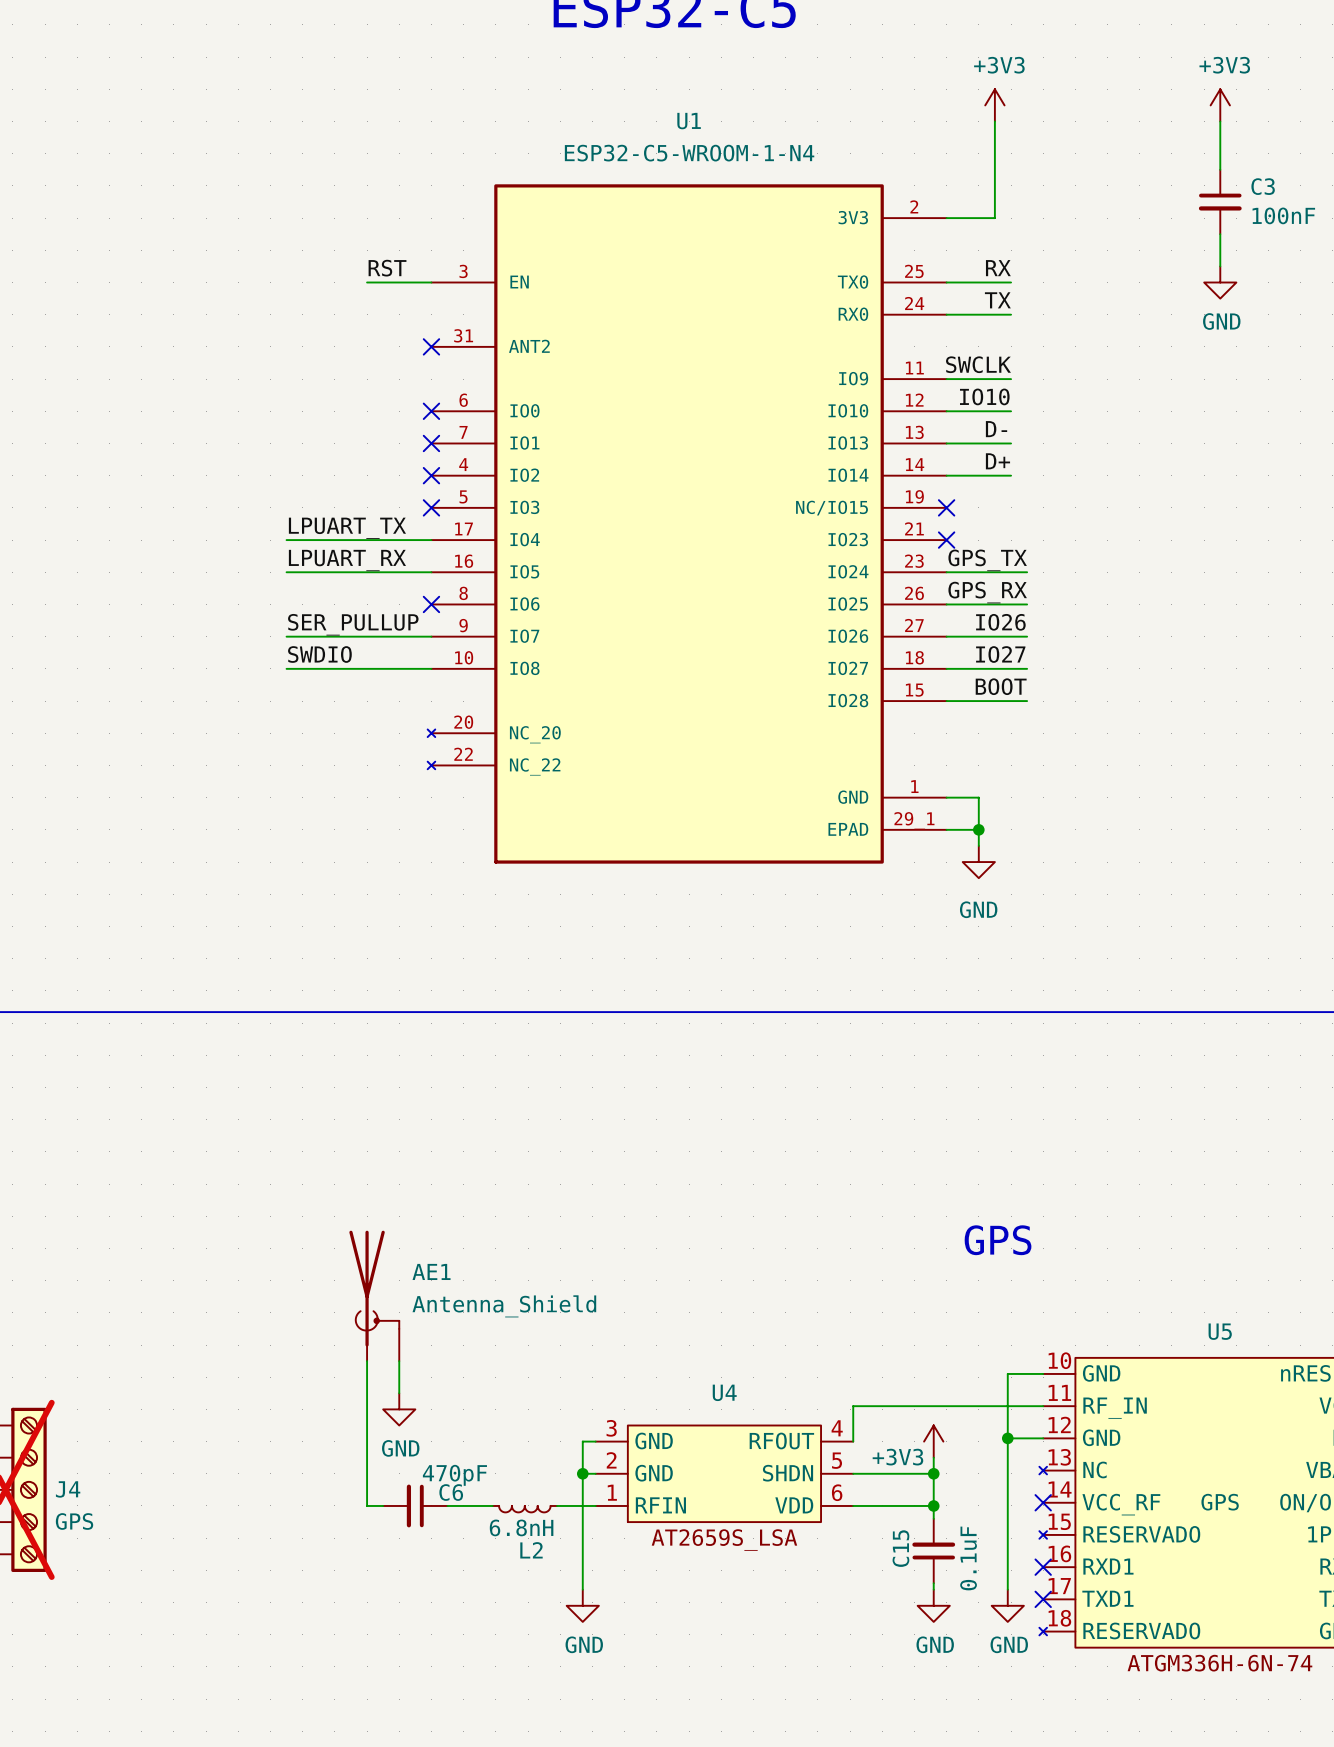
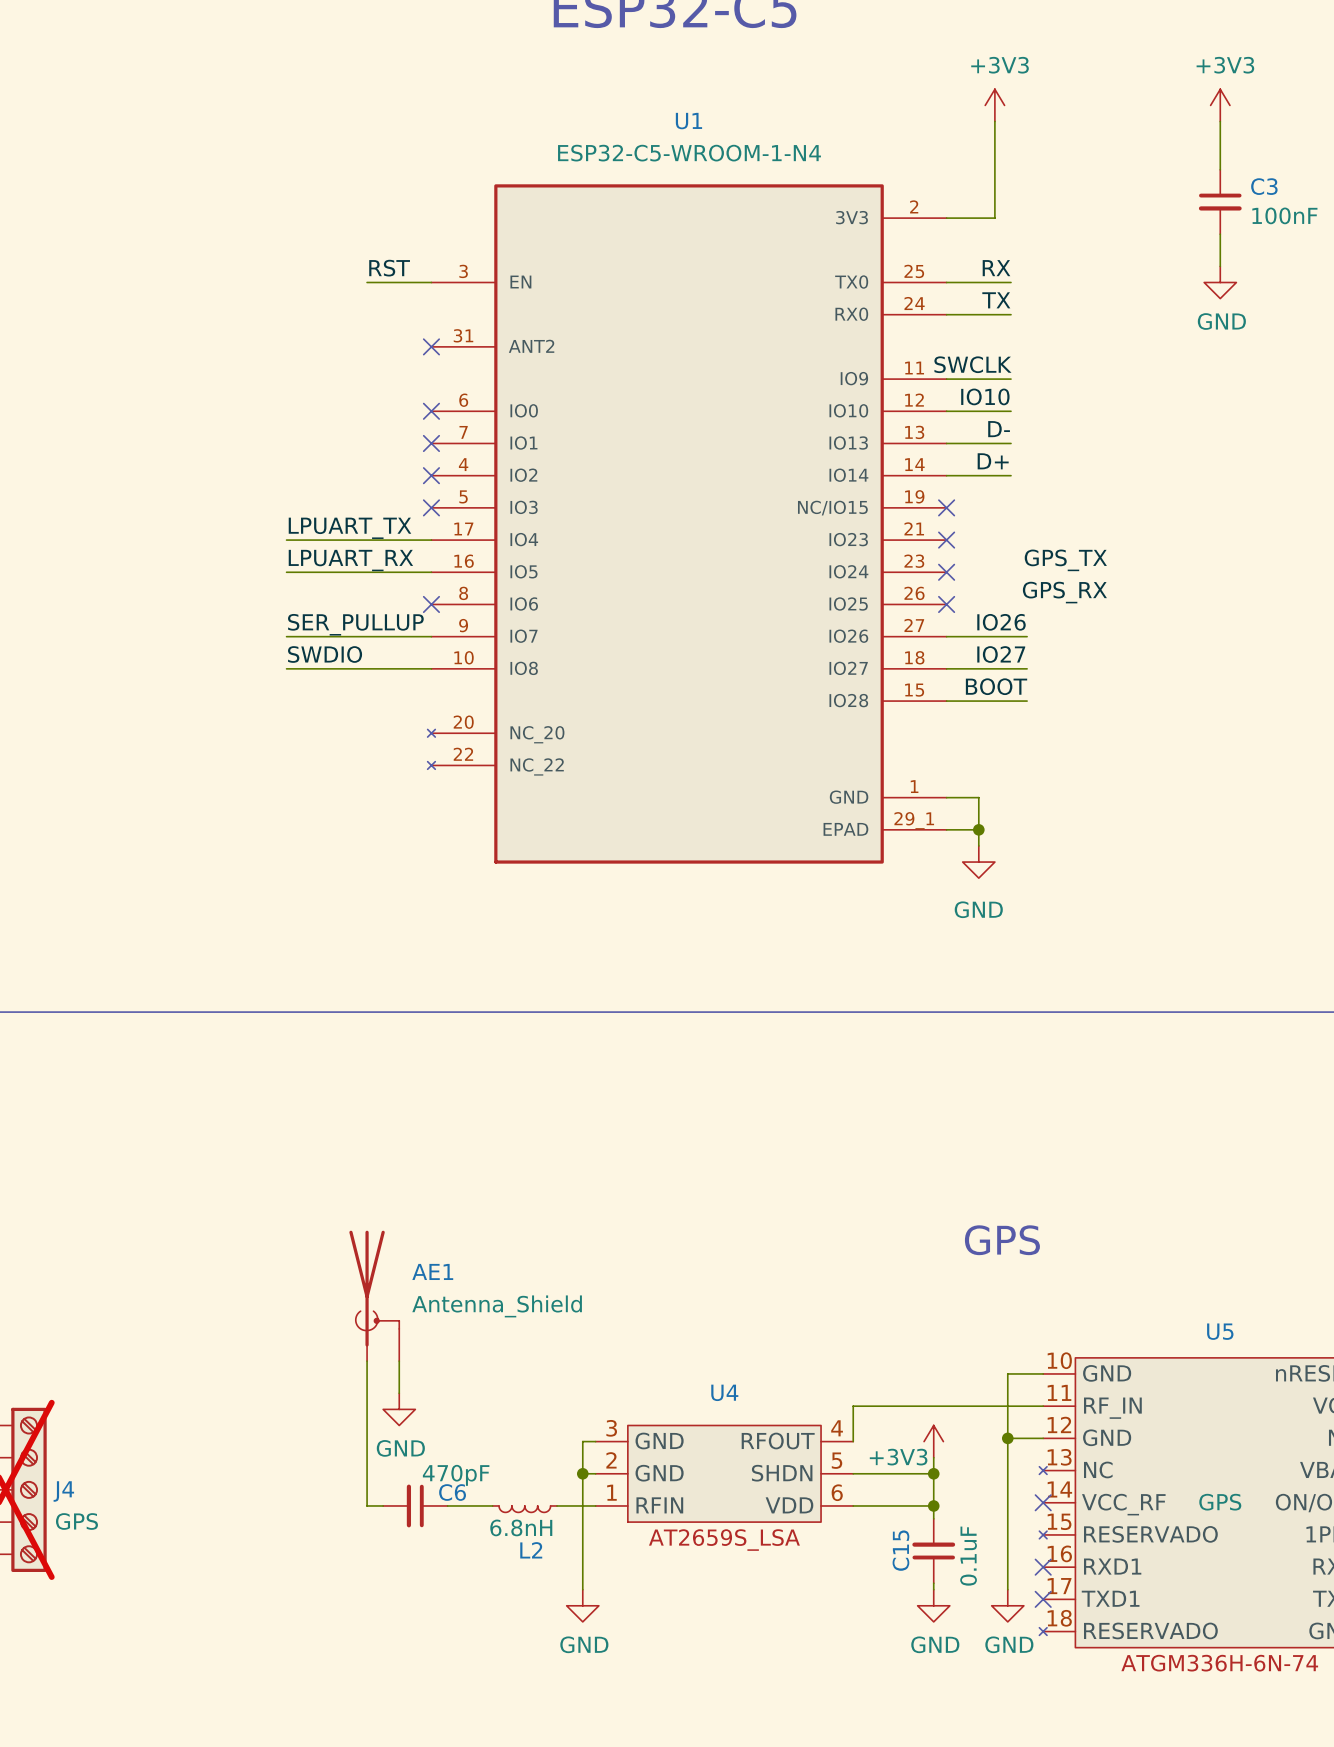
label position: GPS_TX (987, 560) -> GPS_TX (1065, 560)
wire: (946, 572) (1027, 572) -> none
no-connect mark: none -> (946, 572)
label position: GPS_RX (987, 592) -> GPS_RX (1064, 592)
wire: (946, 604) (1027, 604) -> none
no-connect mark: none -> (946, 604)

